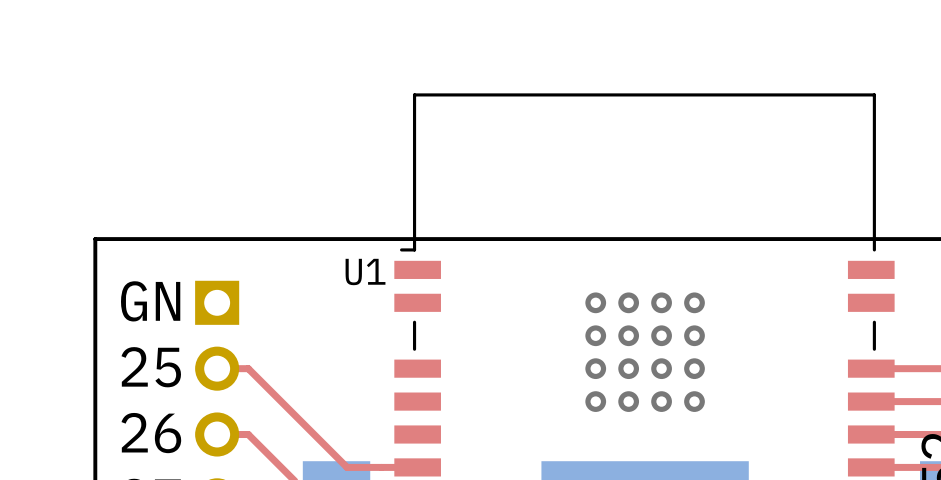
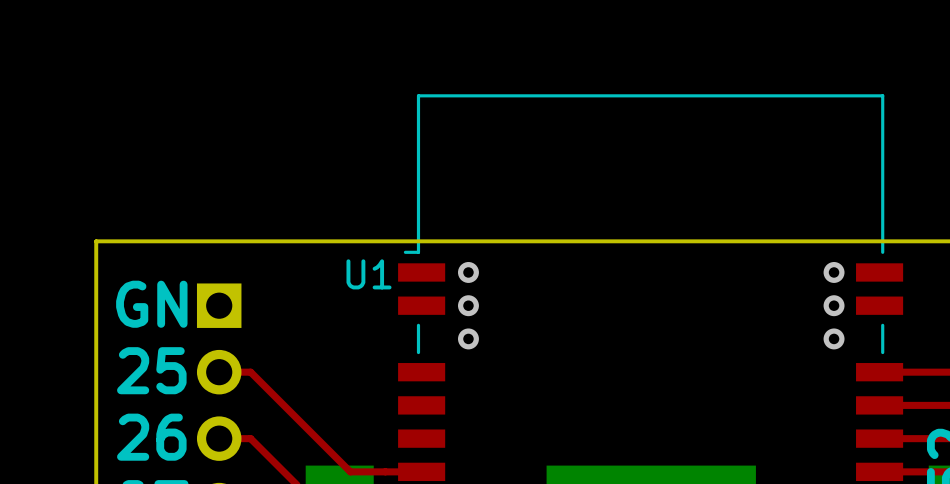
via: none -> (468, 272)
via: none -> (834, 272)
via: none -> (468, 305)
via: (595, 302) -> none
via: (628, 302) -> none
via: (661, 302) -> none
via: (694, 302) -> none
via: none -> (834, 305)
via: none -> (468, 338)
via: (595, 335) -> none
via: (628, 335) -> none
via: (661, 335) -> none
via: (694, 335) -> none
via: none -> (834, 338)
via: (595, 368) -> none
via: (628, 368) -> none
via: (661, 368) -> none
via: (694, 368) -> none
via: (595, 401) -> none
via: (628, 401) -> none
via: (661, 401) -> none
via: (694, 401) -> none

